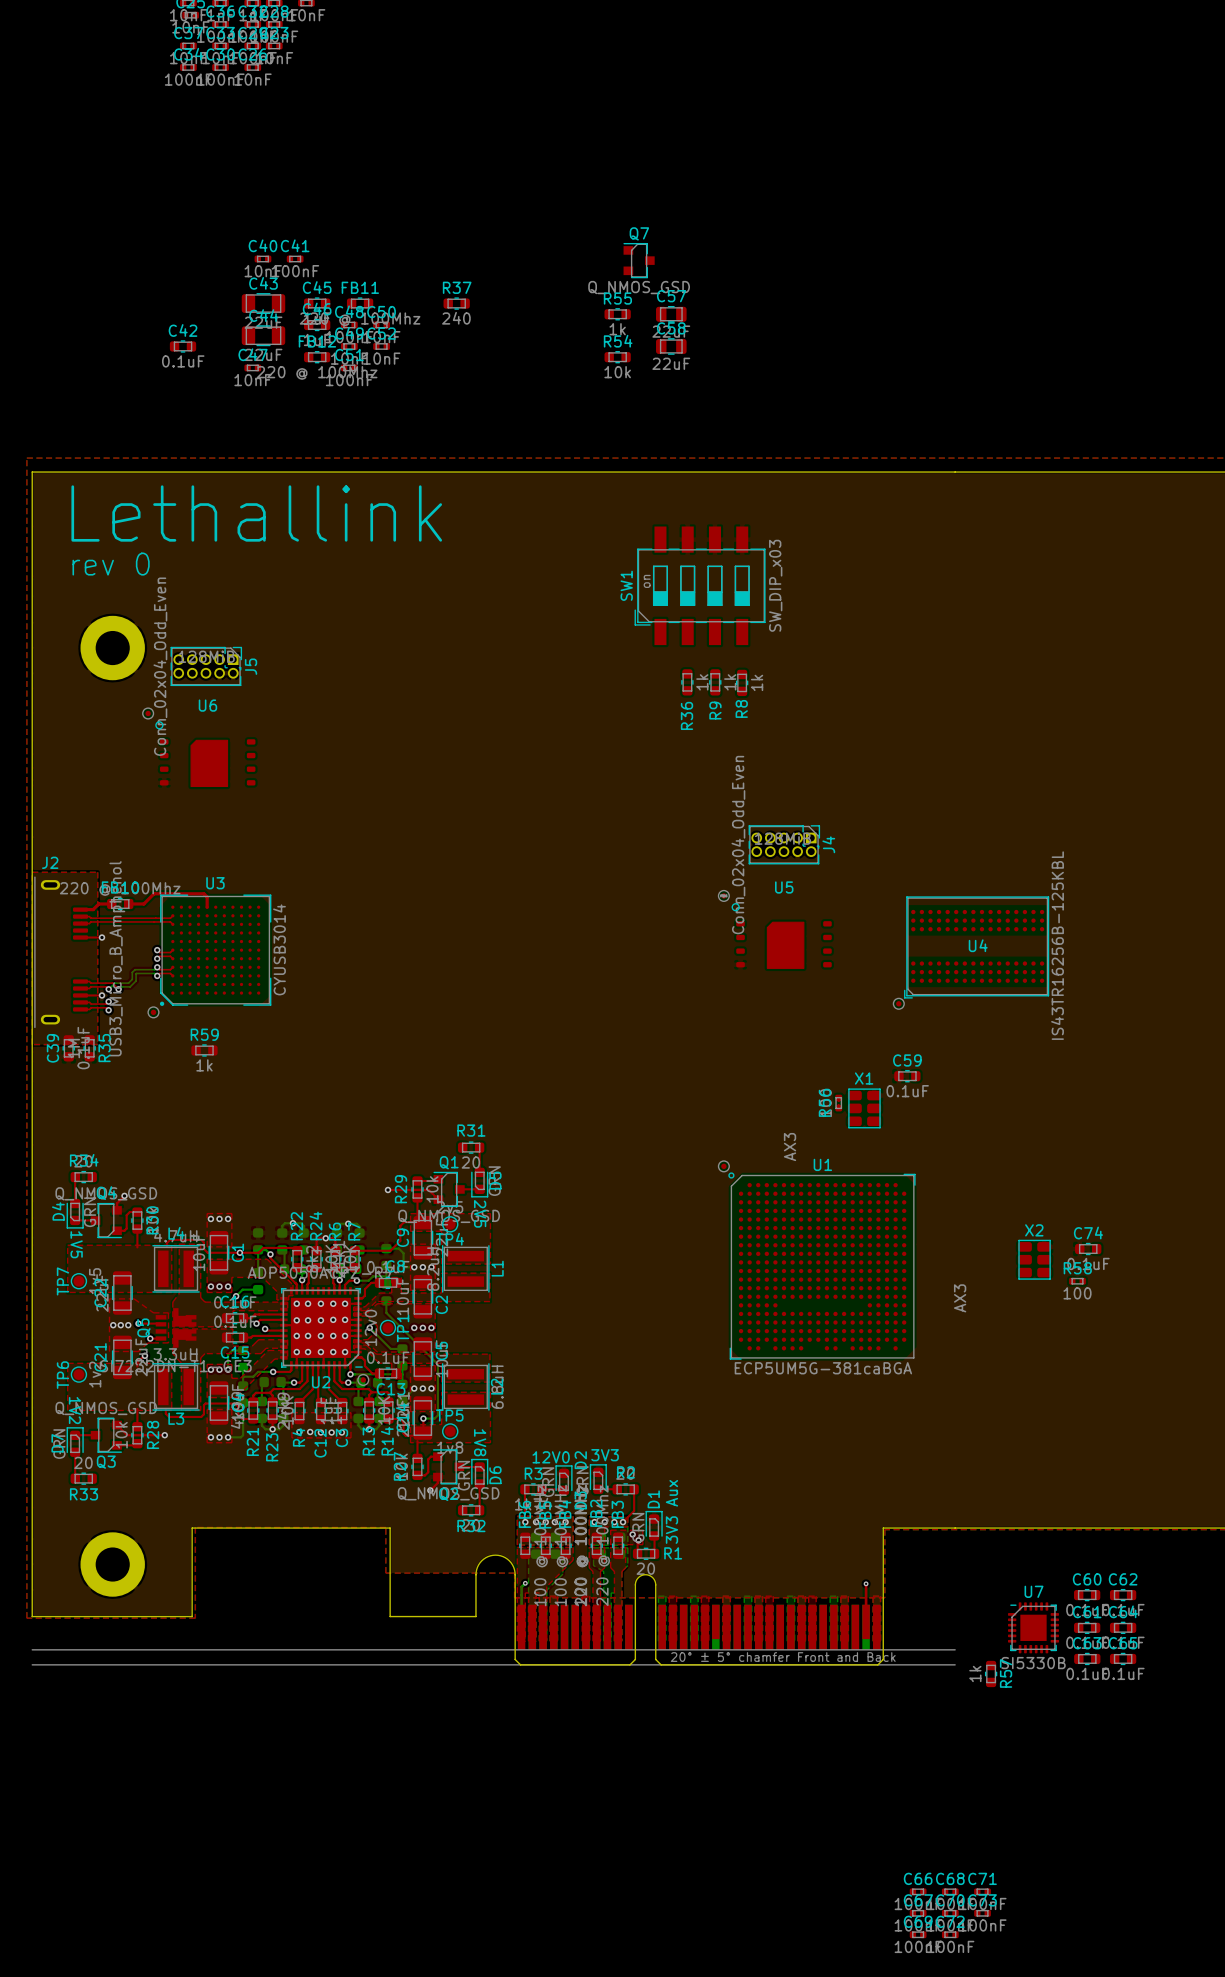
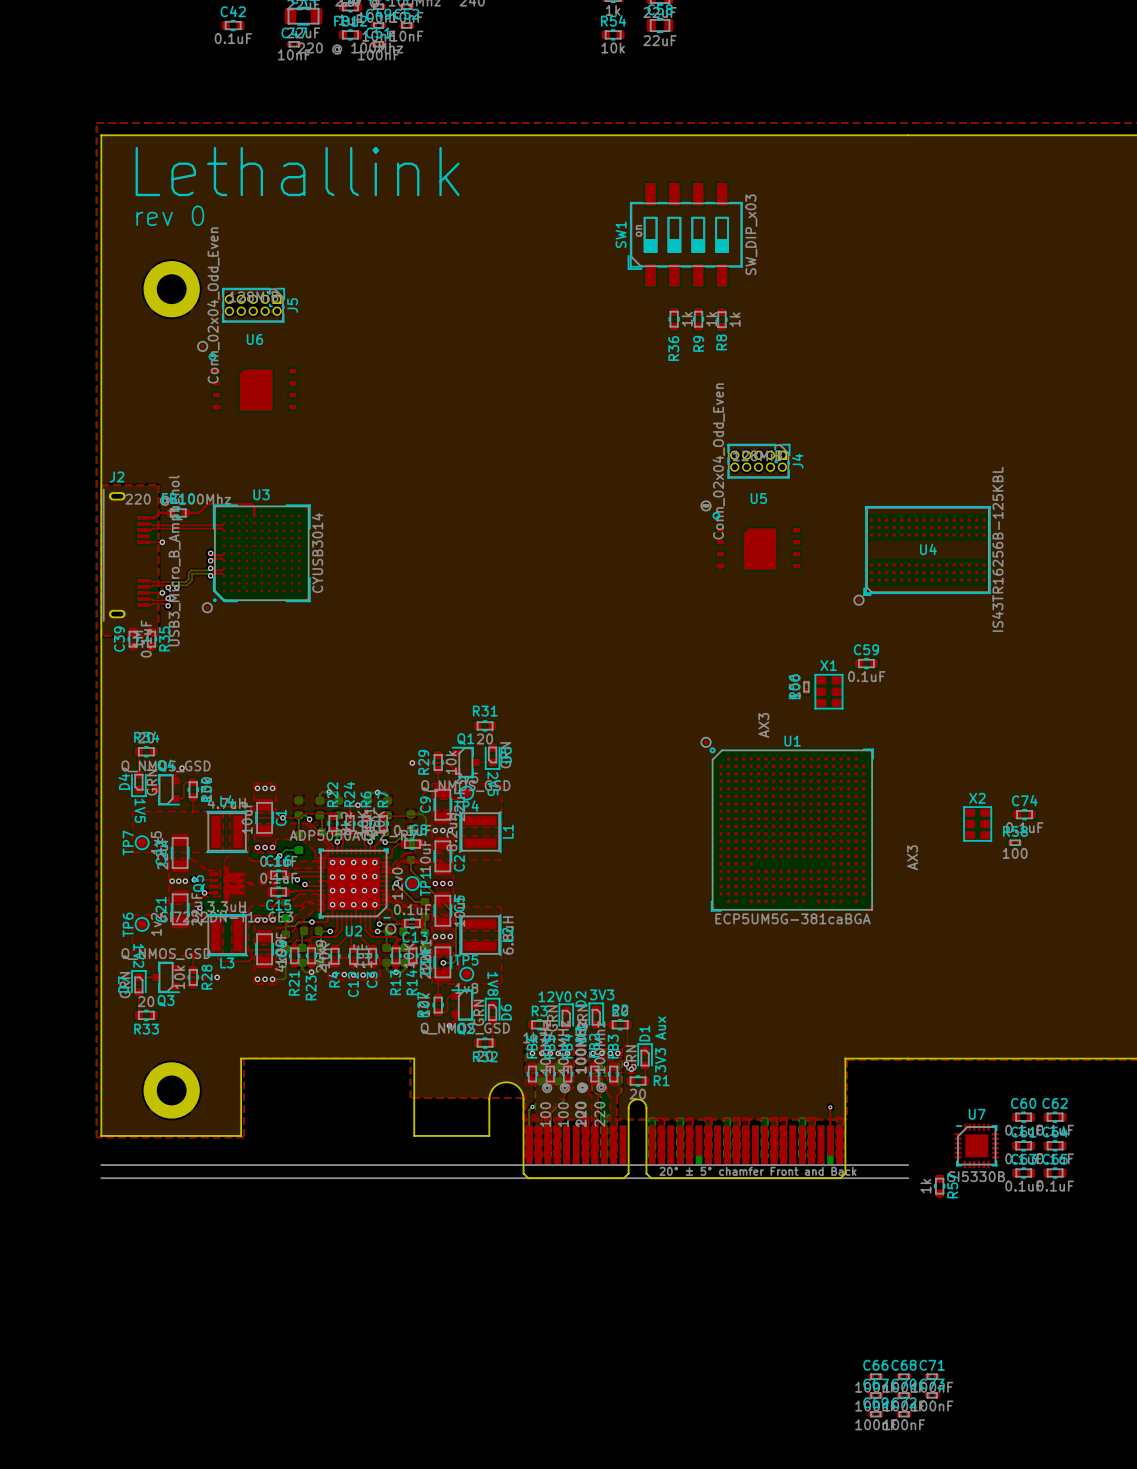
R59: 1k (204, 1050) -> none

